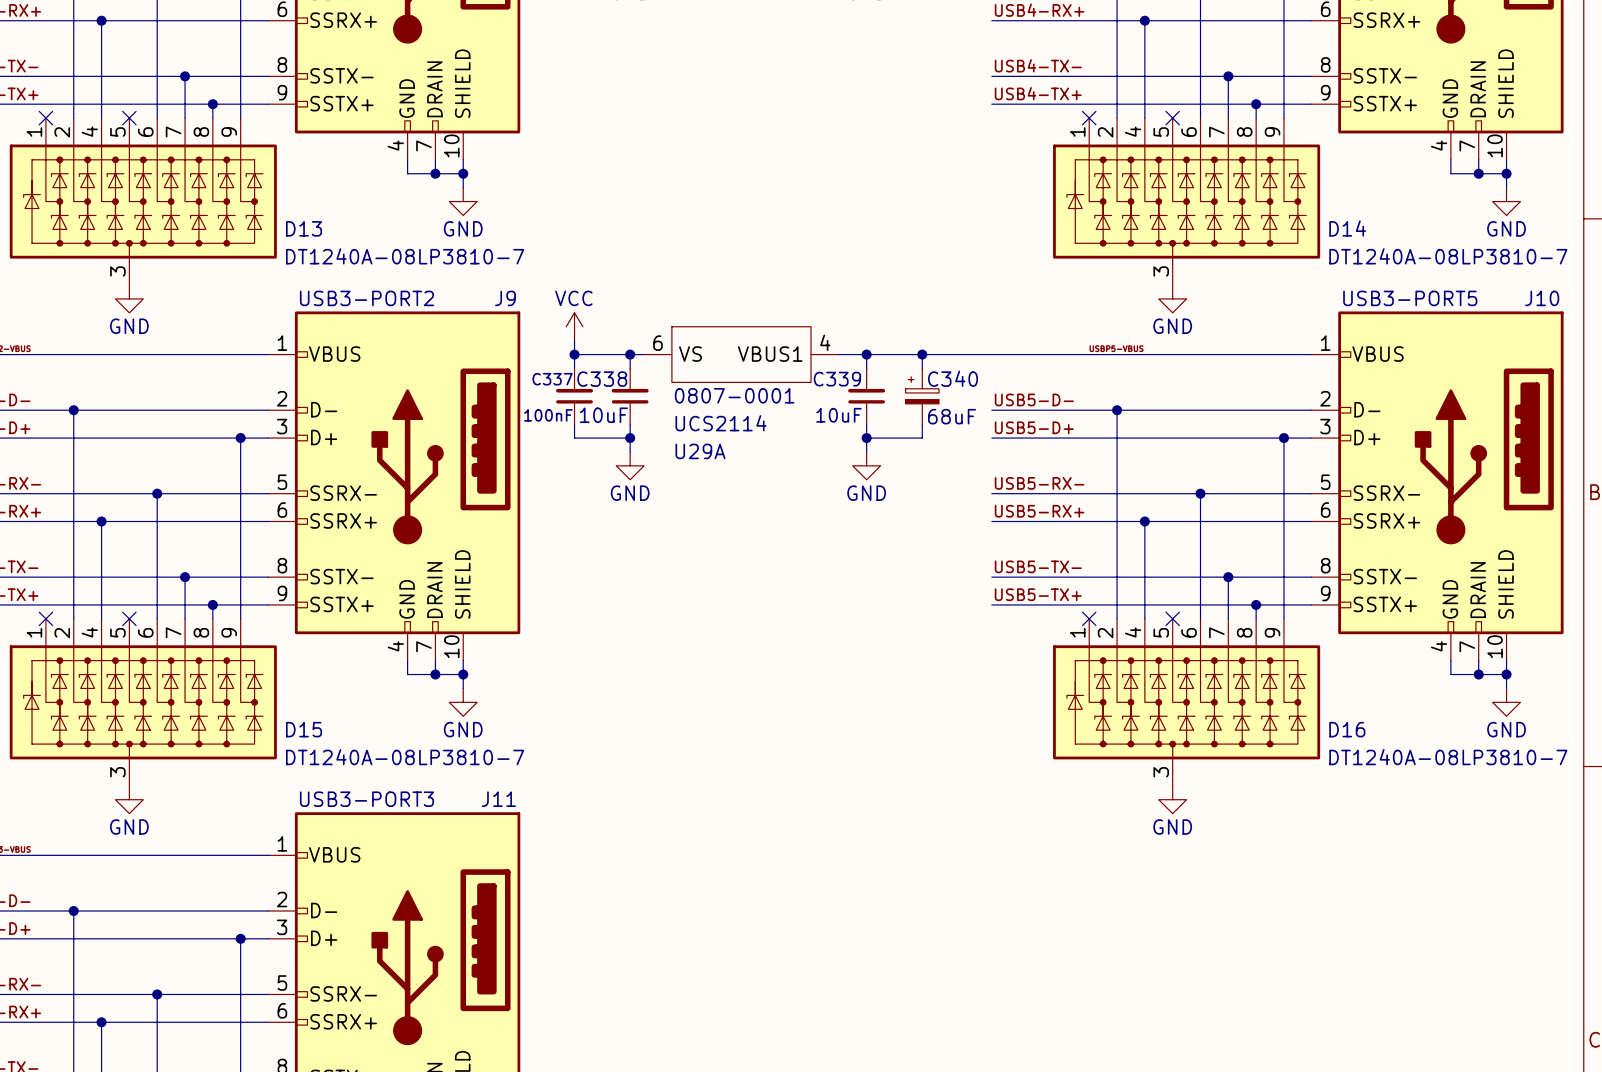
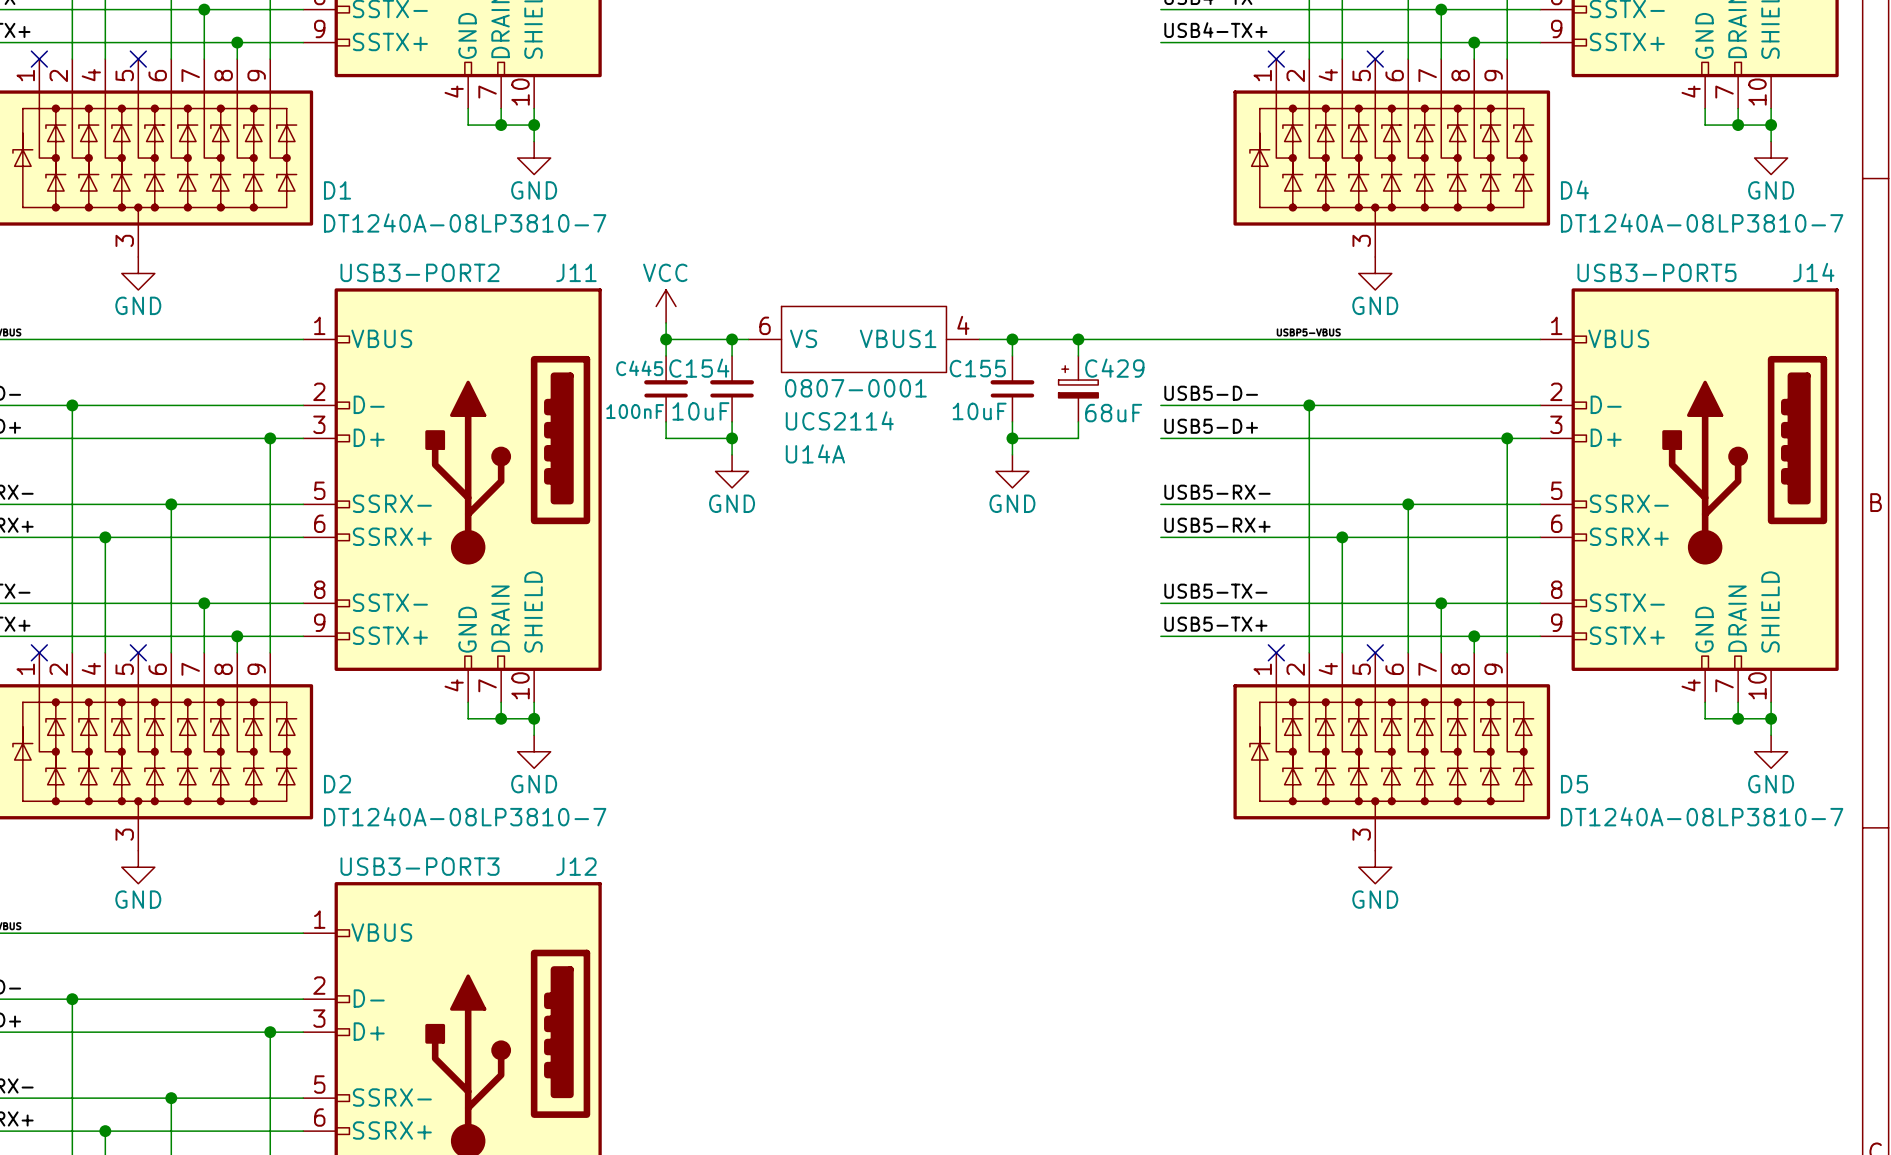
D13 name: D13 (304, 228) -> D1 (337, 190)
D14 name: D14 (1347, 228) -> D4 (1574, 190)
J9 name: J9 (505, 298) -> J11 (576, 272)
J10 name: J10 (1542, 298) -> J14 (1813, 272)
C340 name: C340 (953, 378) -> C429 (1114, 368)
C337 name: C337 (552, 379) -> C445 (639, 368)
C338 name: C338 (602, 379) -> C154 (699, 368)
C339 name: C339 (837, 379) -> C155 (977, 368)
U29A name: U29A (700, 451) -> U14A (815, 453)
D15 name: D15 (304, 729) -> D2 (337, 784)
D16 name: D16 (1347, 729) -> D5 (1574, 784)
J11 name: J11 (498, 799) -> J12 (576, 866)

